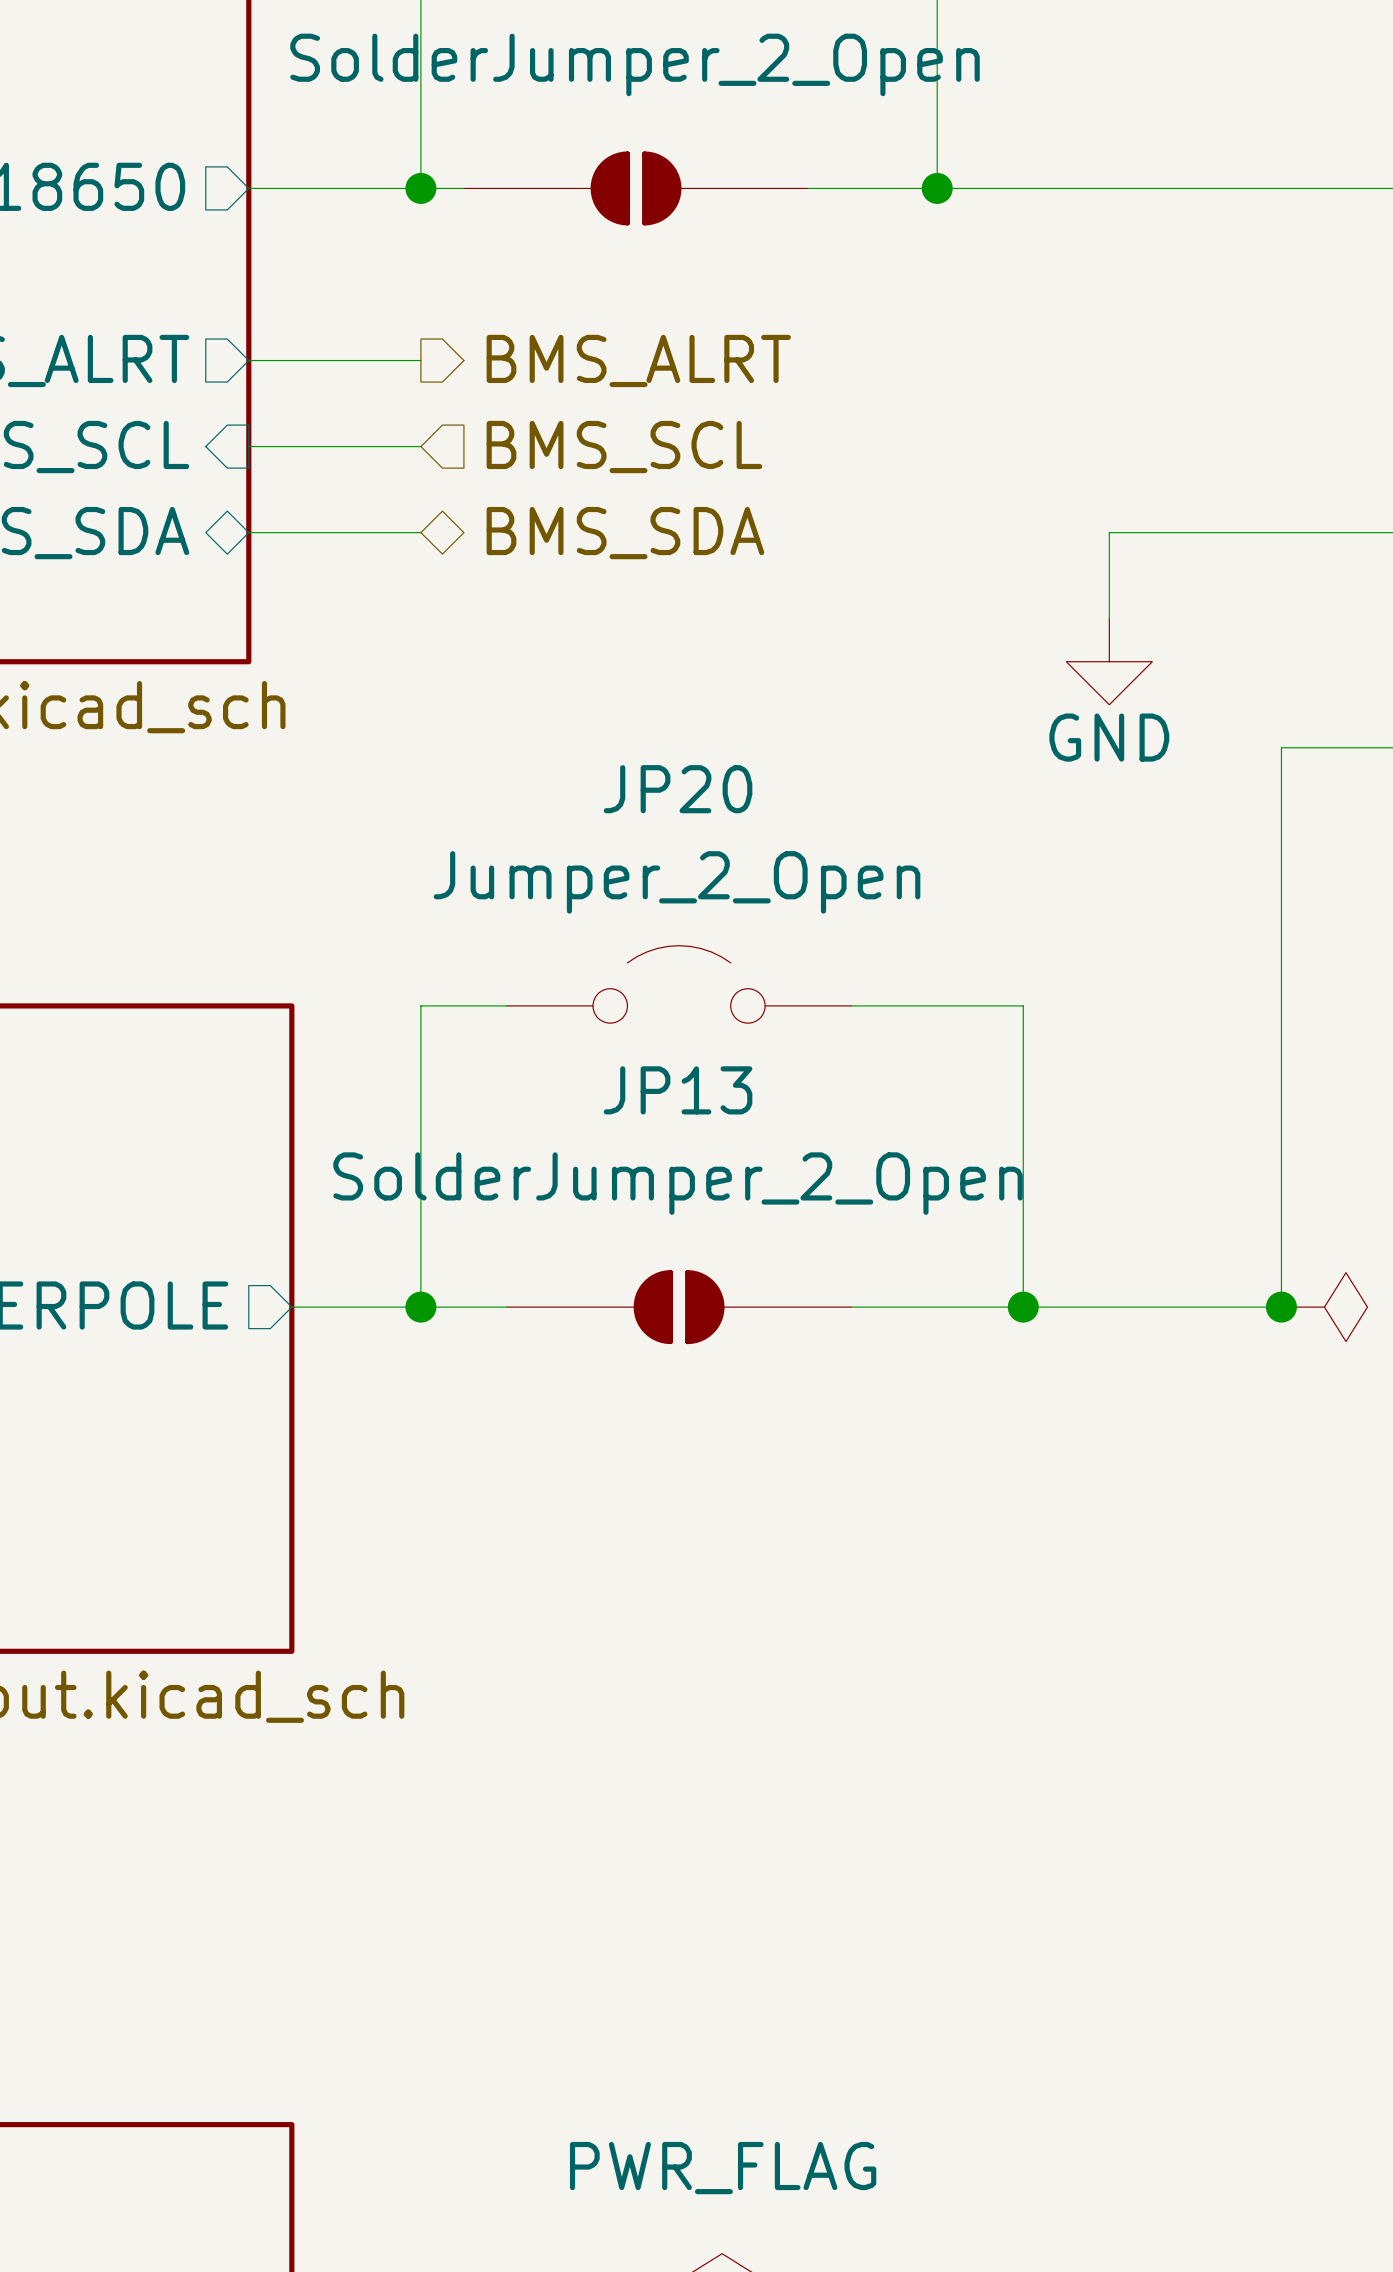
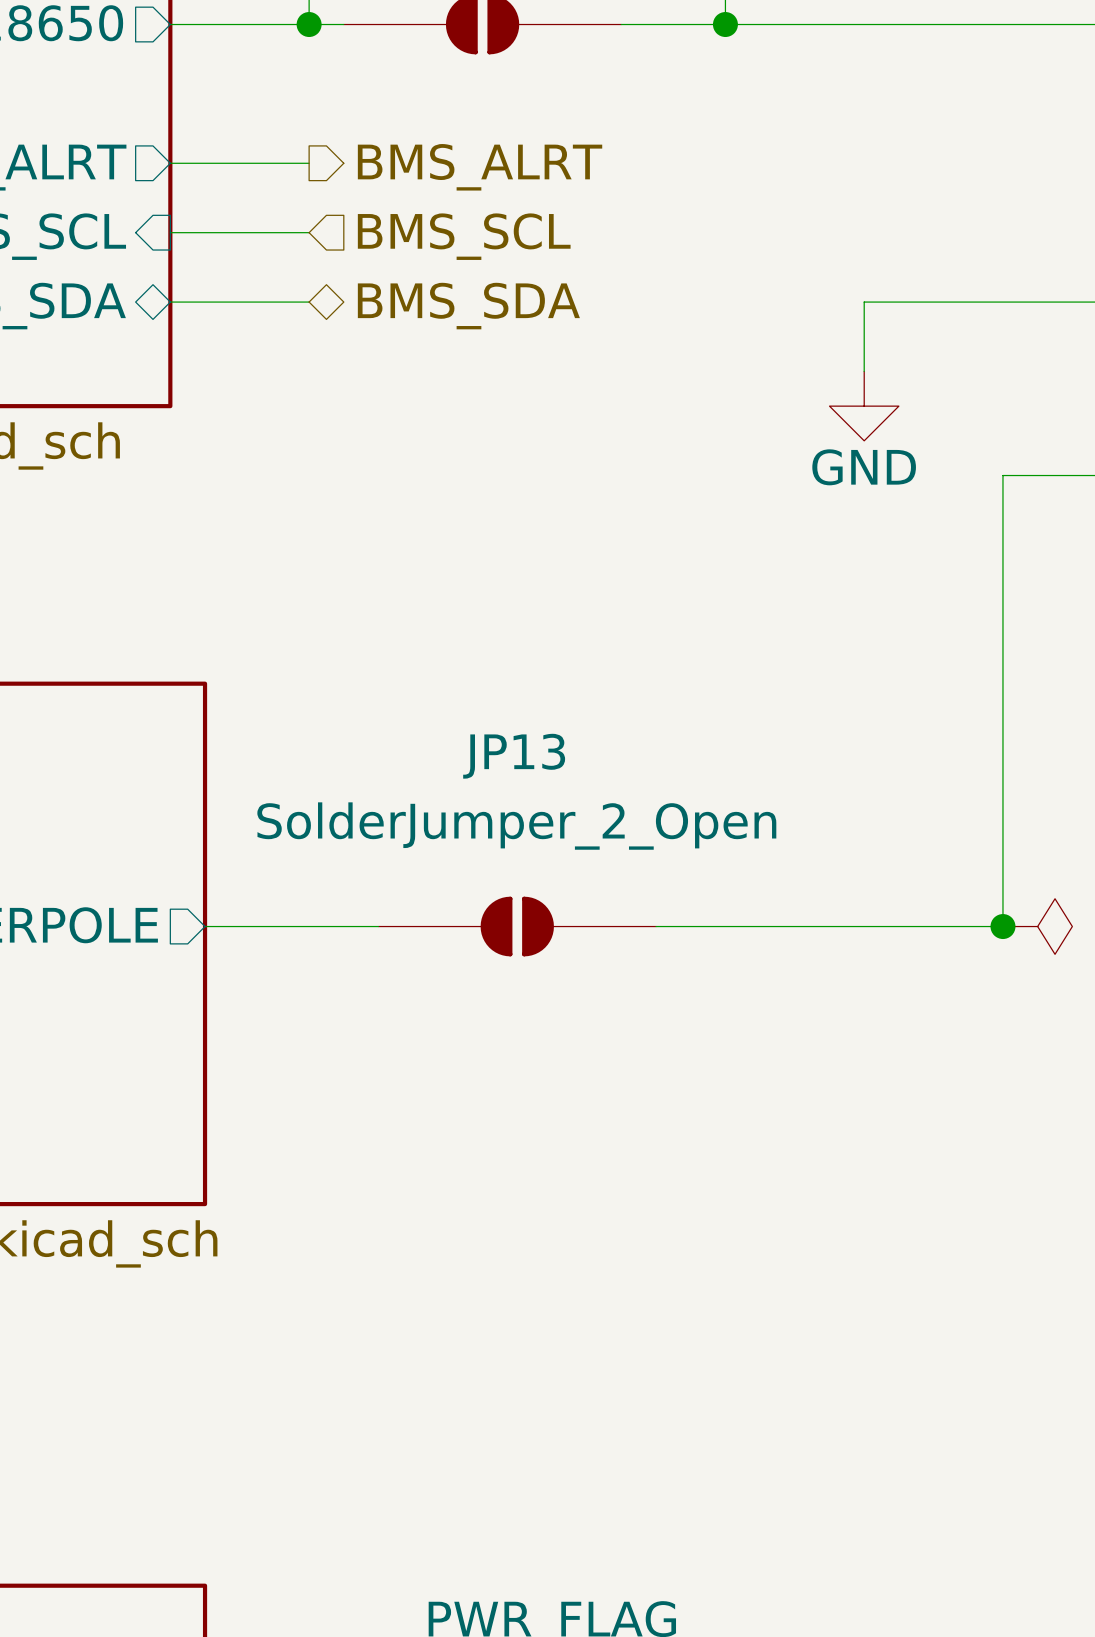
JP20: Jumper_2_Open (679, 984) -> none
wire: (506, 1005) (420, 1005) (420, 1307) -> none
wire: (851, 1005) (1023, 1005) (1023, 1307) -> none
junction: (420, 1307) -> none
junction: (1023, 1307) -> none

